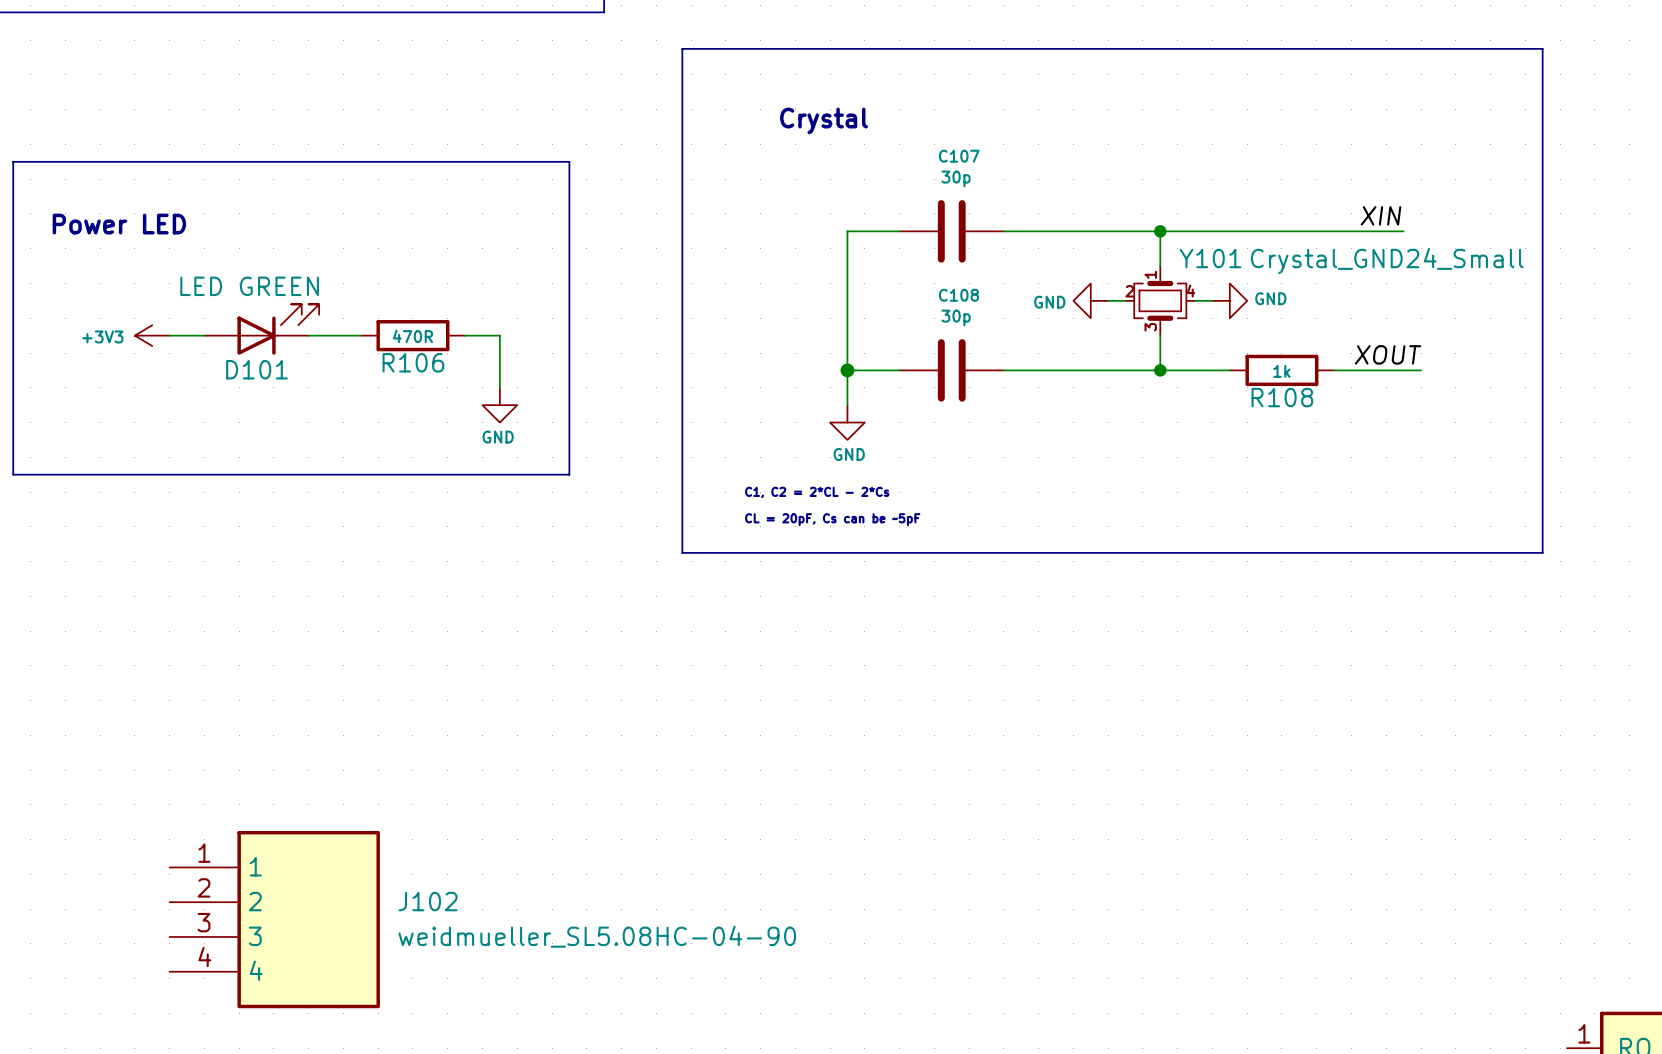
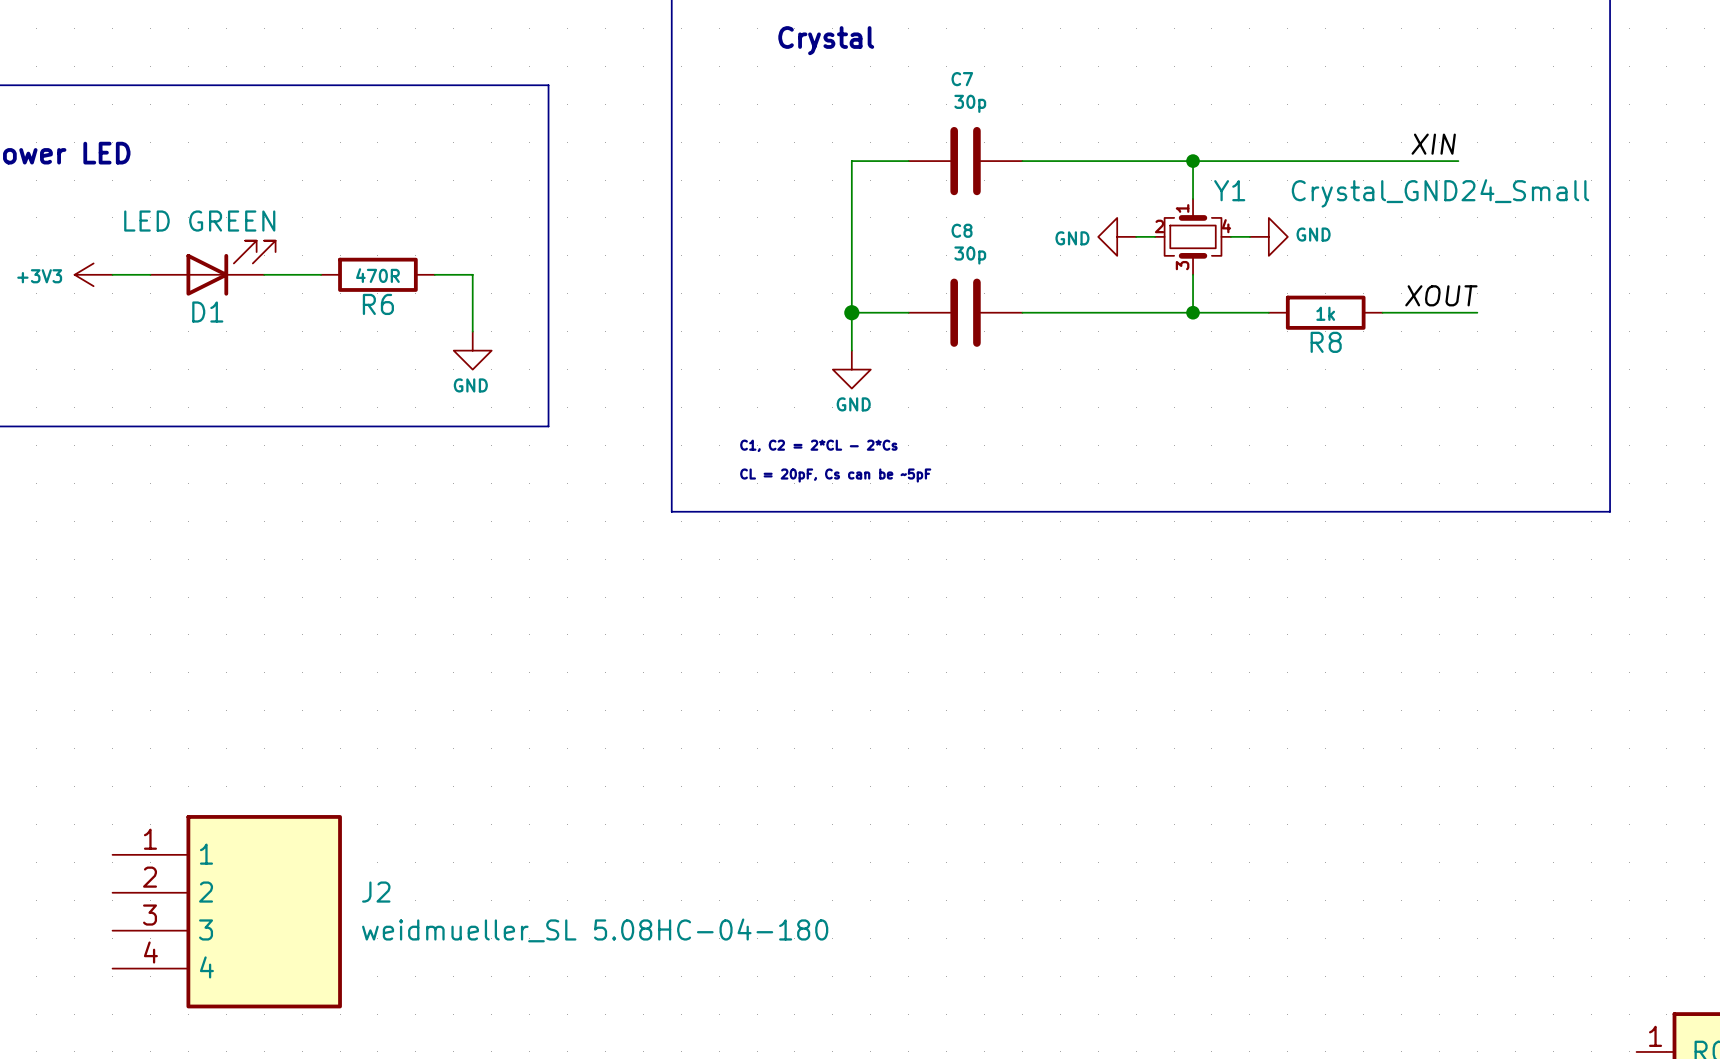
C107 name: C107 (959, 156) -> C7 (962, 79)
Y101 name: Y101 (1210, 258) -> Y1 (1229, 190)
C108 name: C108 (958, 295) -> C8 (962, 230)
R106 name: R106 (413, 362) -> R6 (378, 304)
D101 name: D101 (256, 369) -> D1 (207, 312)
R108 name: R108 (1282, 397) -> R8 (1326, 342)
J102 name: J102 (427, 901) -> J2 (376, 892)
J102 value: weidmueller_SL5.08HC-04-90 (597, 936) -> weidmueller_SL 5.08HC-04-180 (595, 930)

